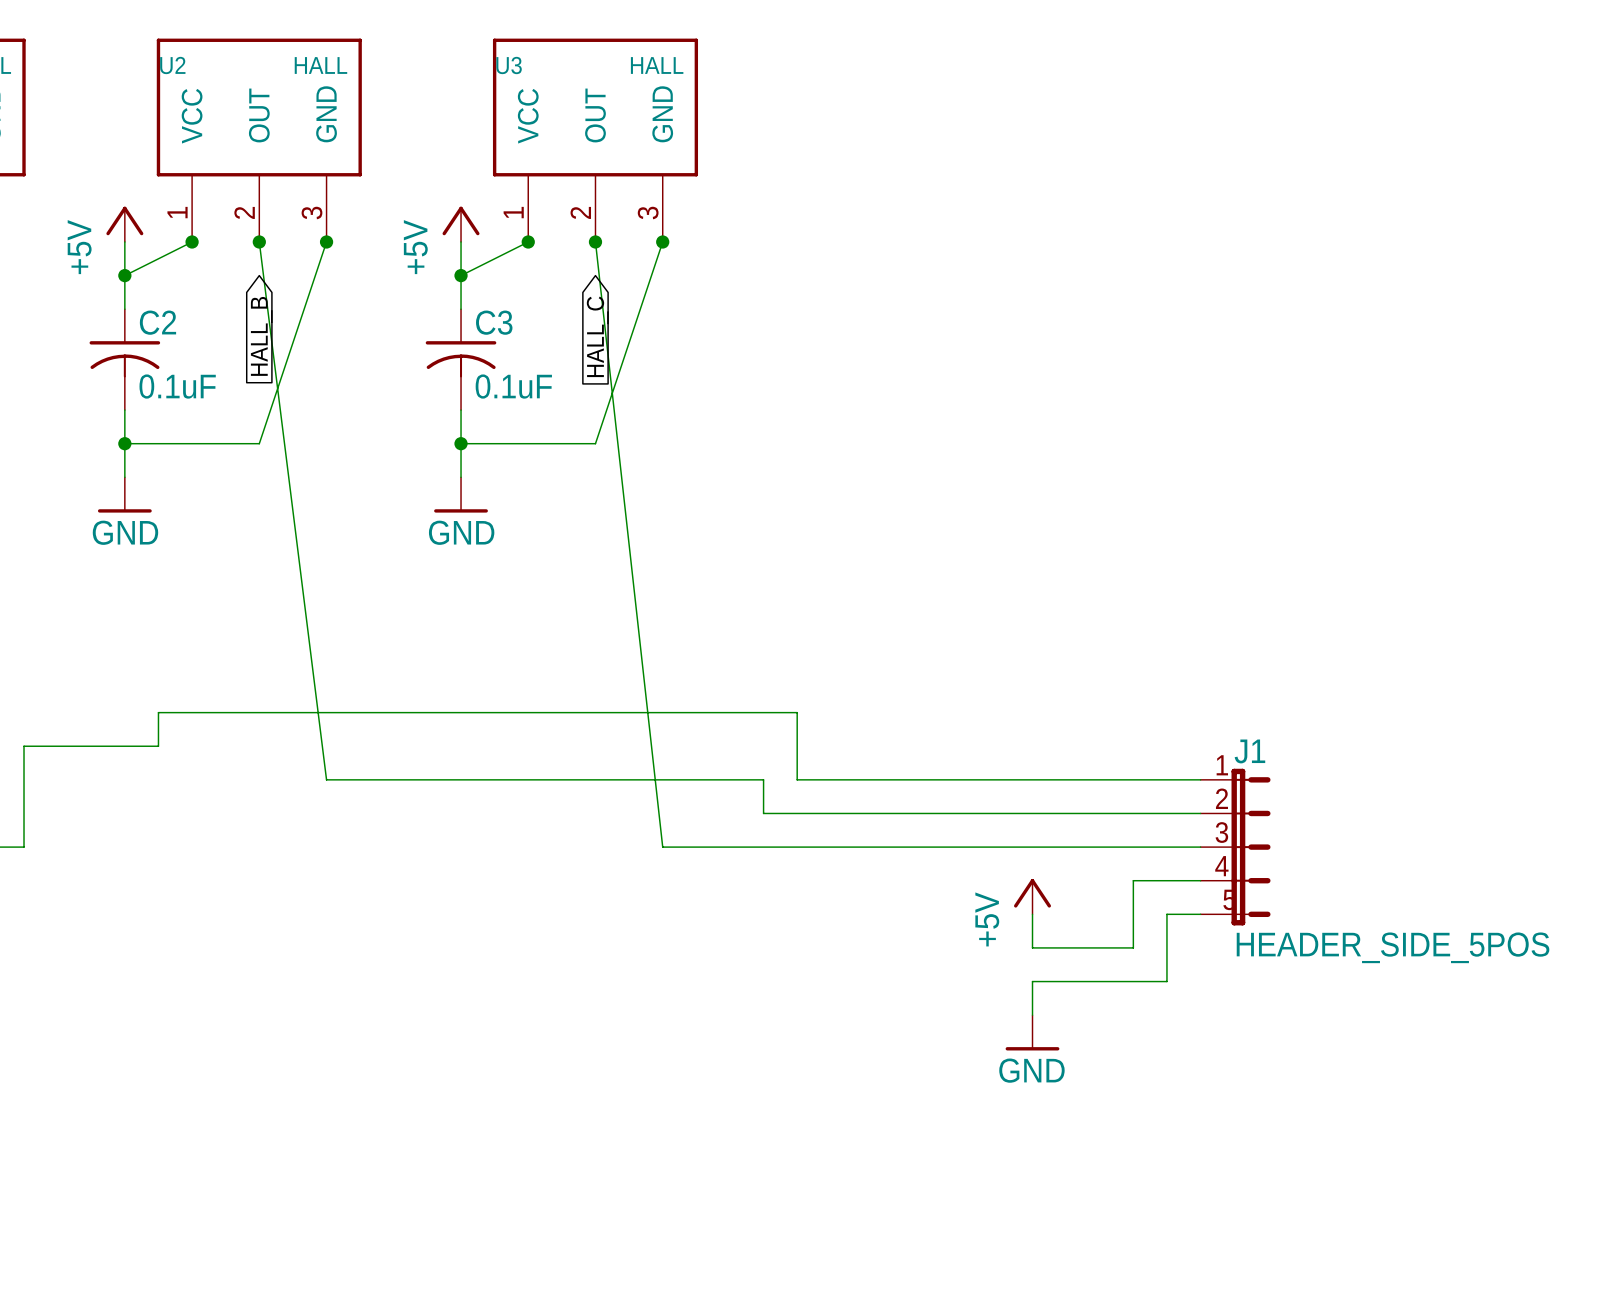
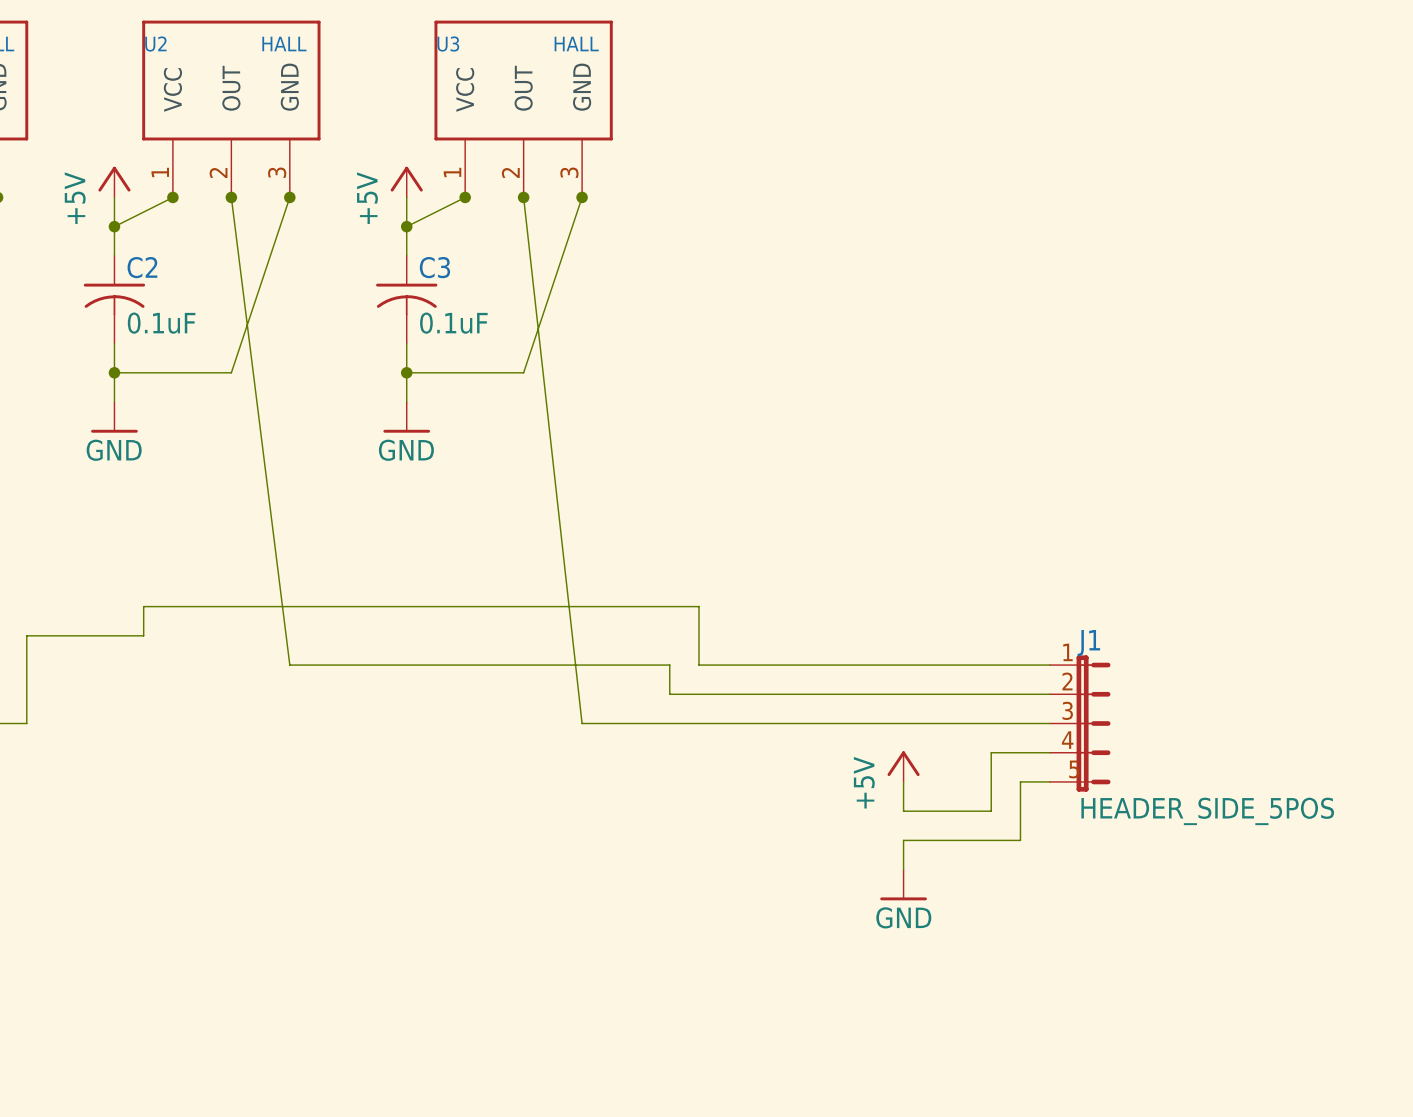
global label: HALL_B (261, 336) -> none
global label: HALL_C (597, 336) -> none

